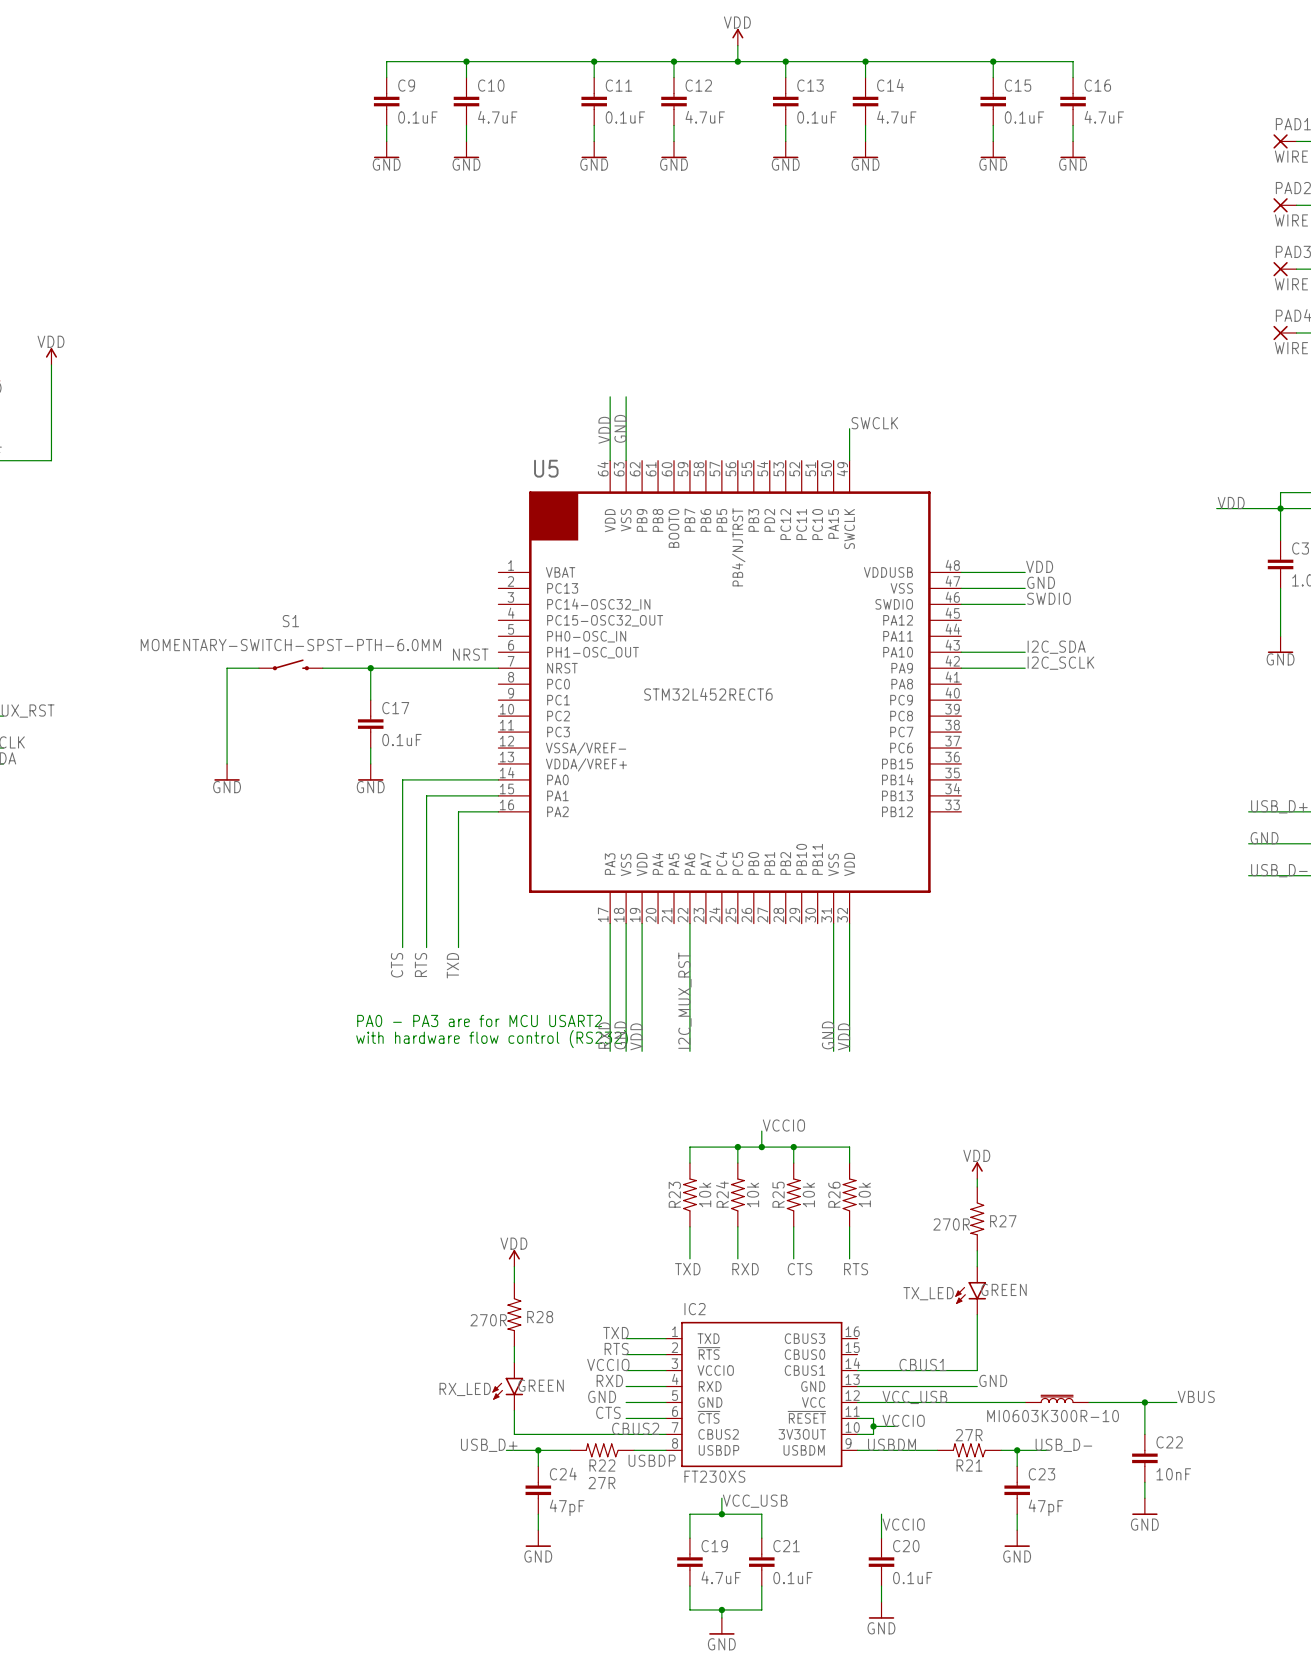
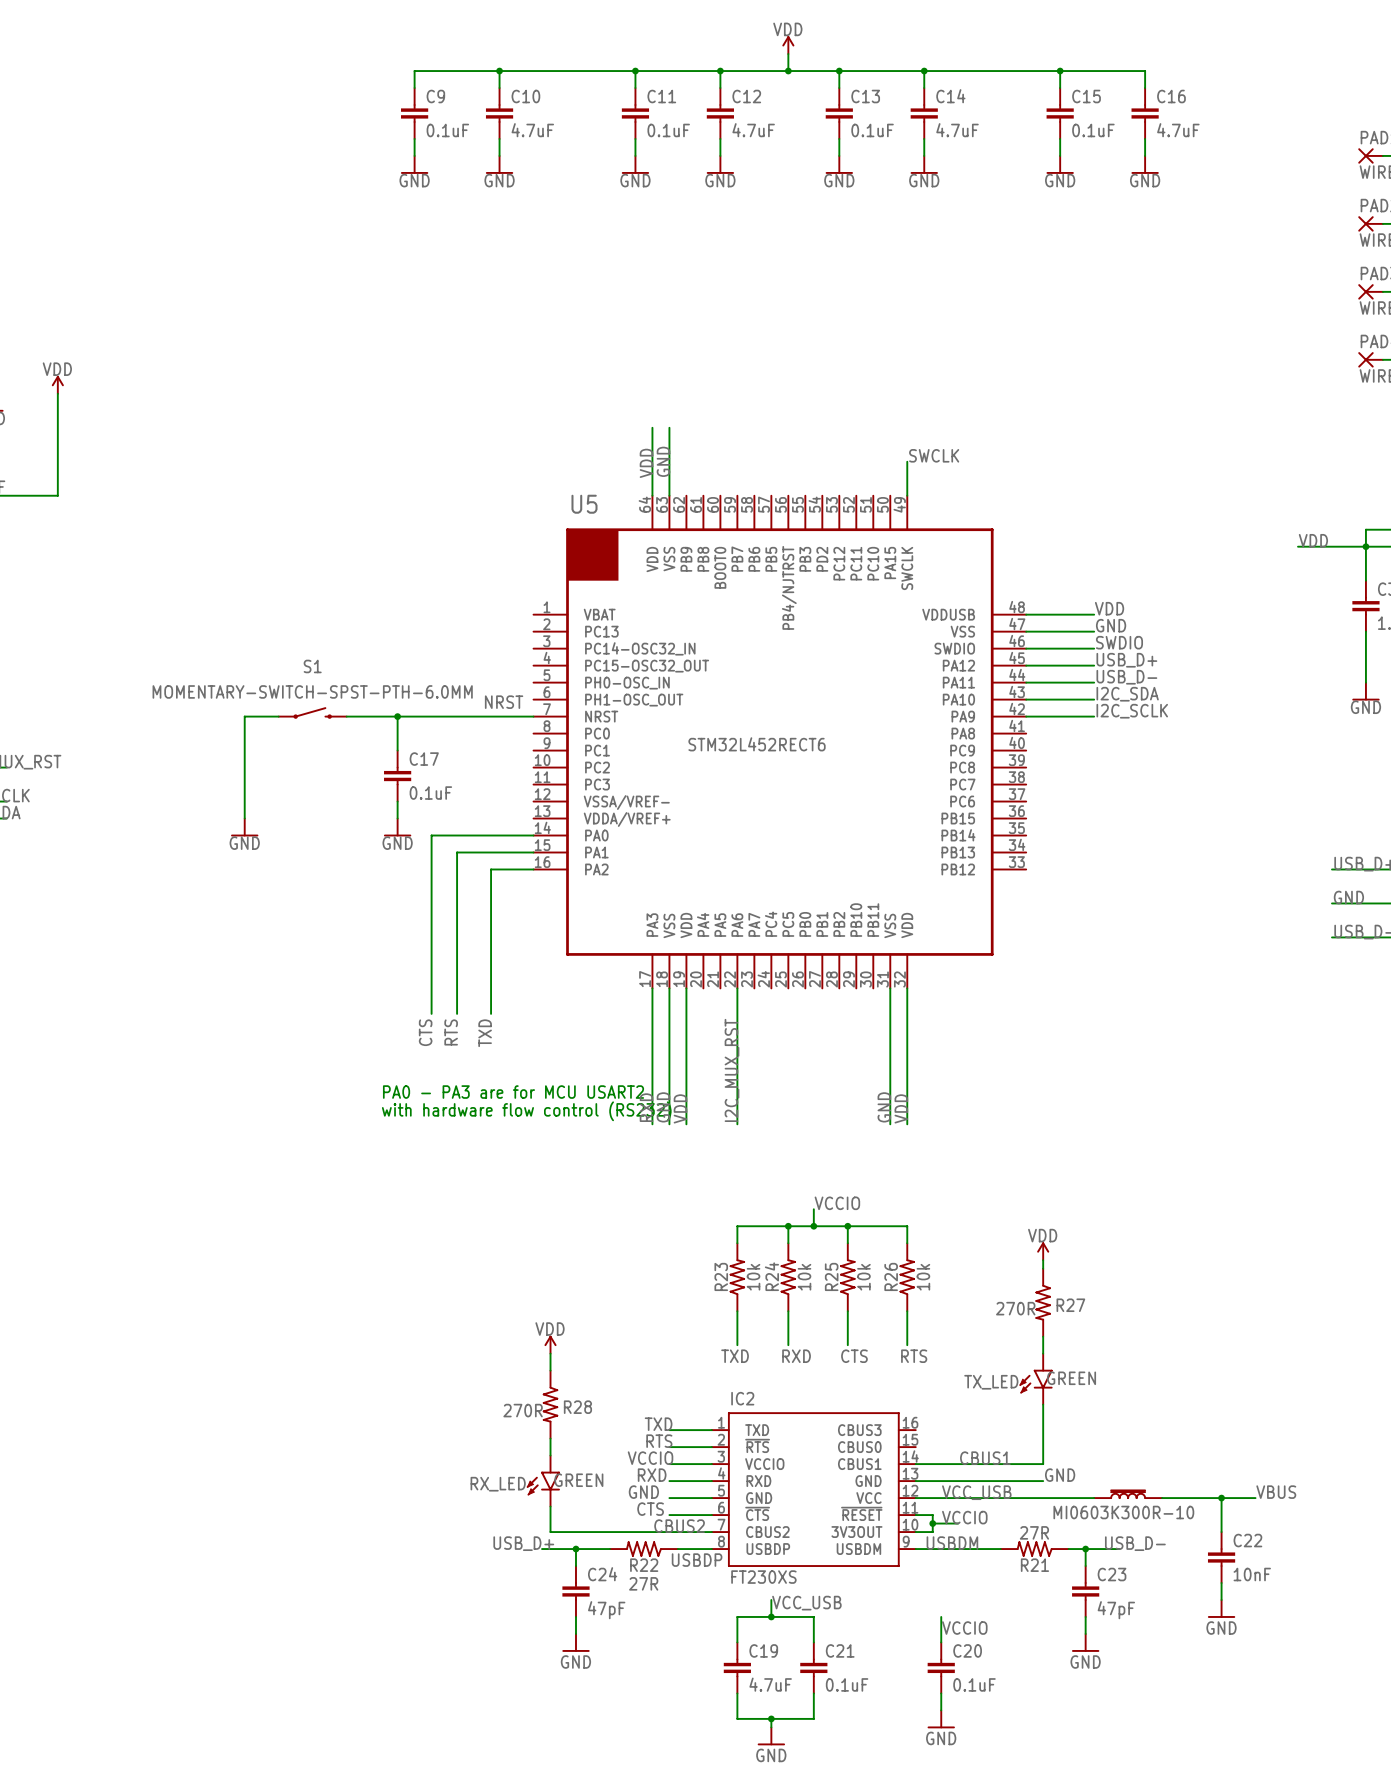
label: none -> USB_D+ (1126, 660)
wire: none -> (1026, 665) (1094, 665)
label: none -> USB_D- (1126, 677)
wire: none -> (1026, 682) (1094, 682)

